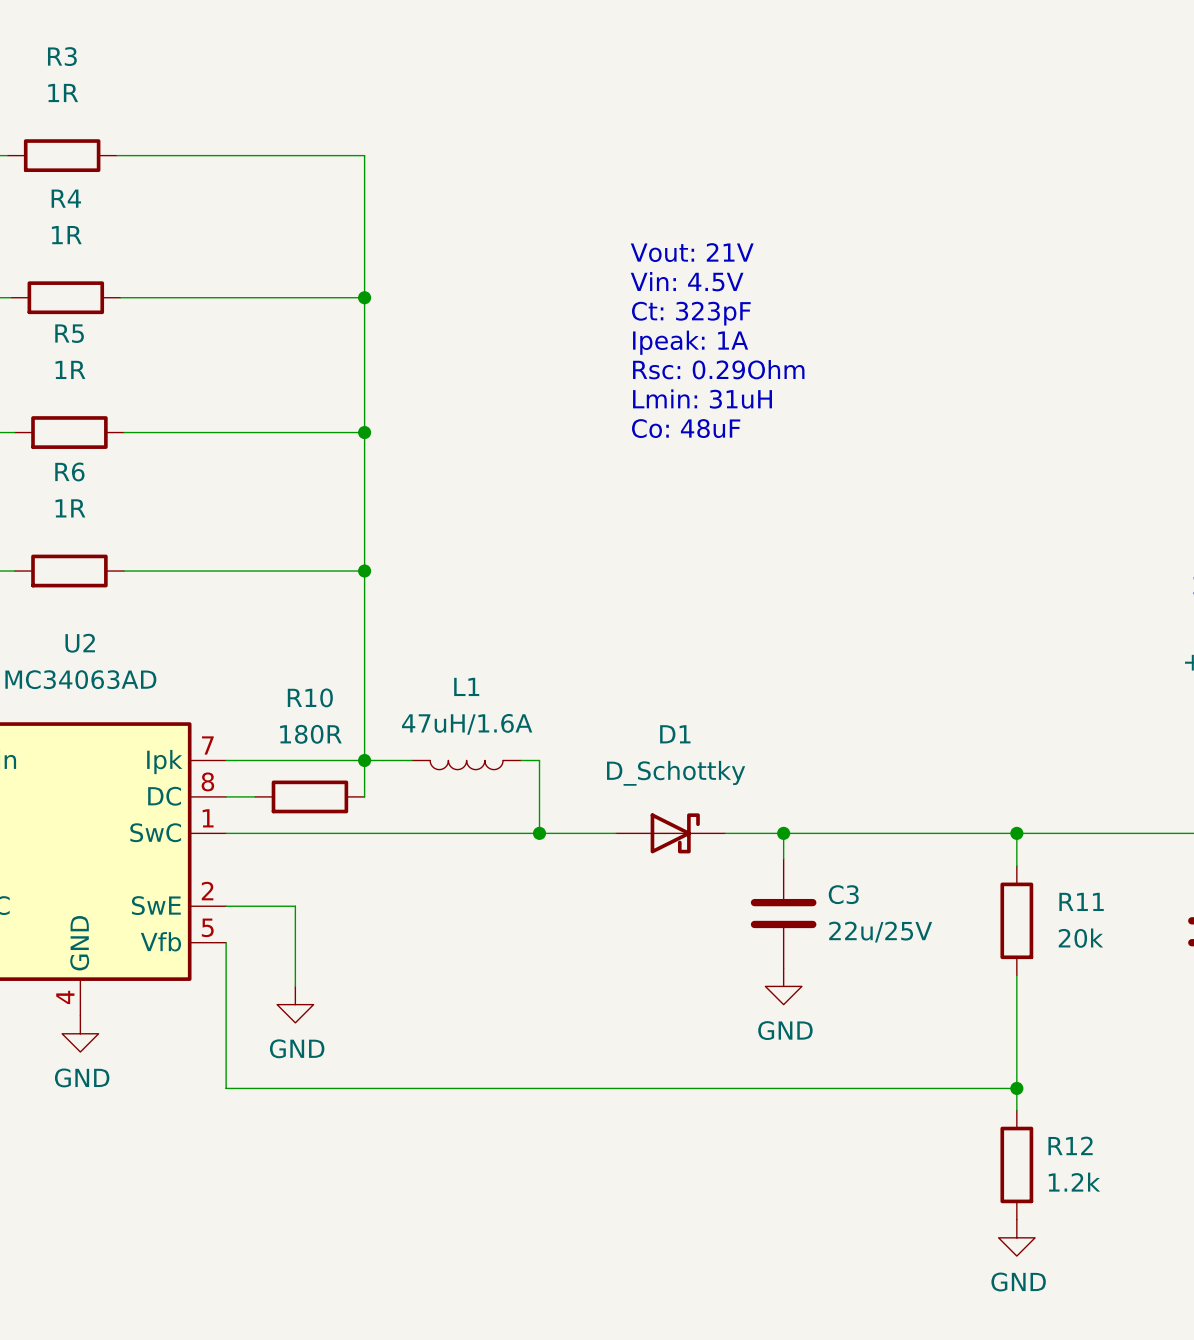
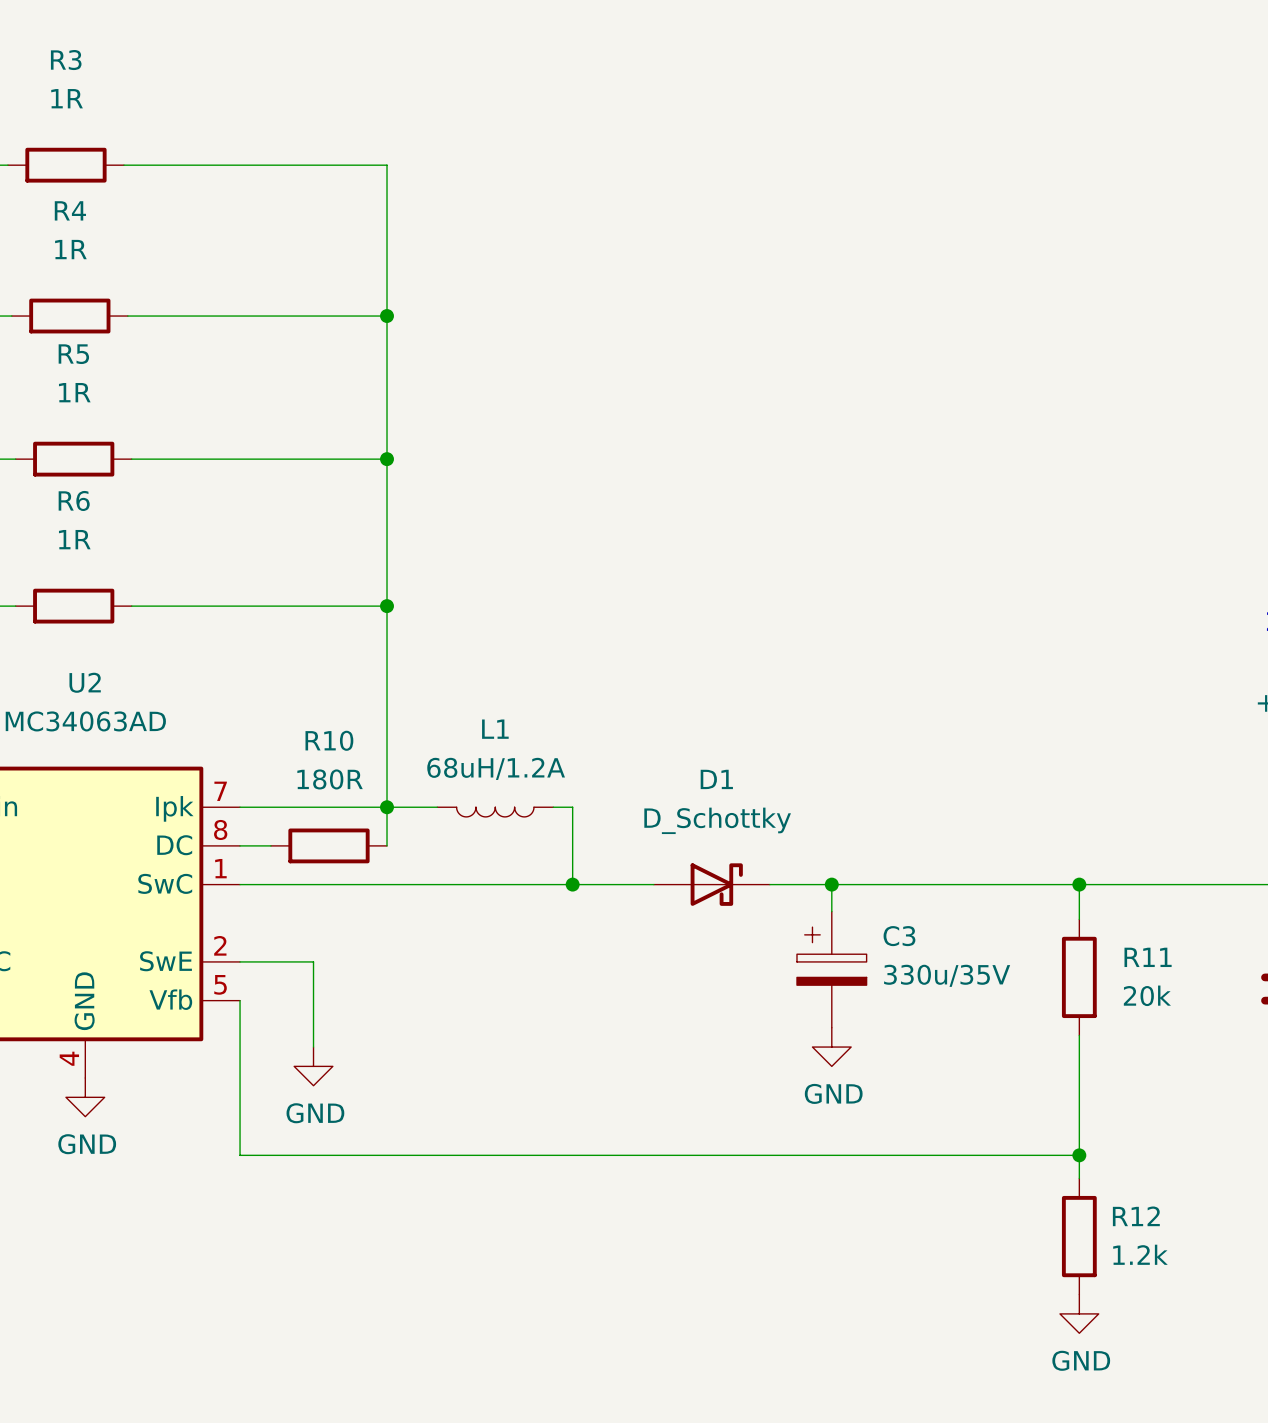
text: Vout: 21V (692, 252) -> none
text: Vin: 4.5V (687, 281) -> none
text: Ct: 323pF (691, 313) -> none
text: Ipeak: 1A (690, 342) -> none
text: Rsc: 0.29Ohm (718, 369) -> none
text: Lmin: 31uH (702, 399) -> none
text: Co: 48uF (686, 428) -> none
L1 value: 47uH/1.6A (467, 724) -> 68uH/1.2A (496, 768)
C3 symbol: [750, 858, 817, 969] -> [796, 911, 867, 1028]
C3 value: 22u/25V (880, 932) -> 330u/35V (947, 975)

